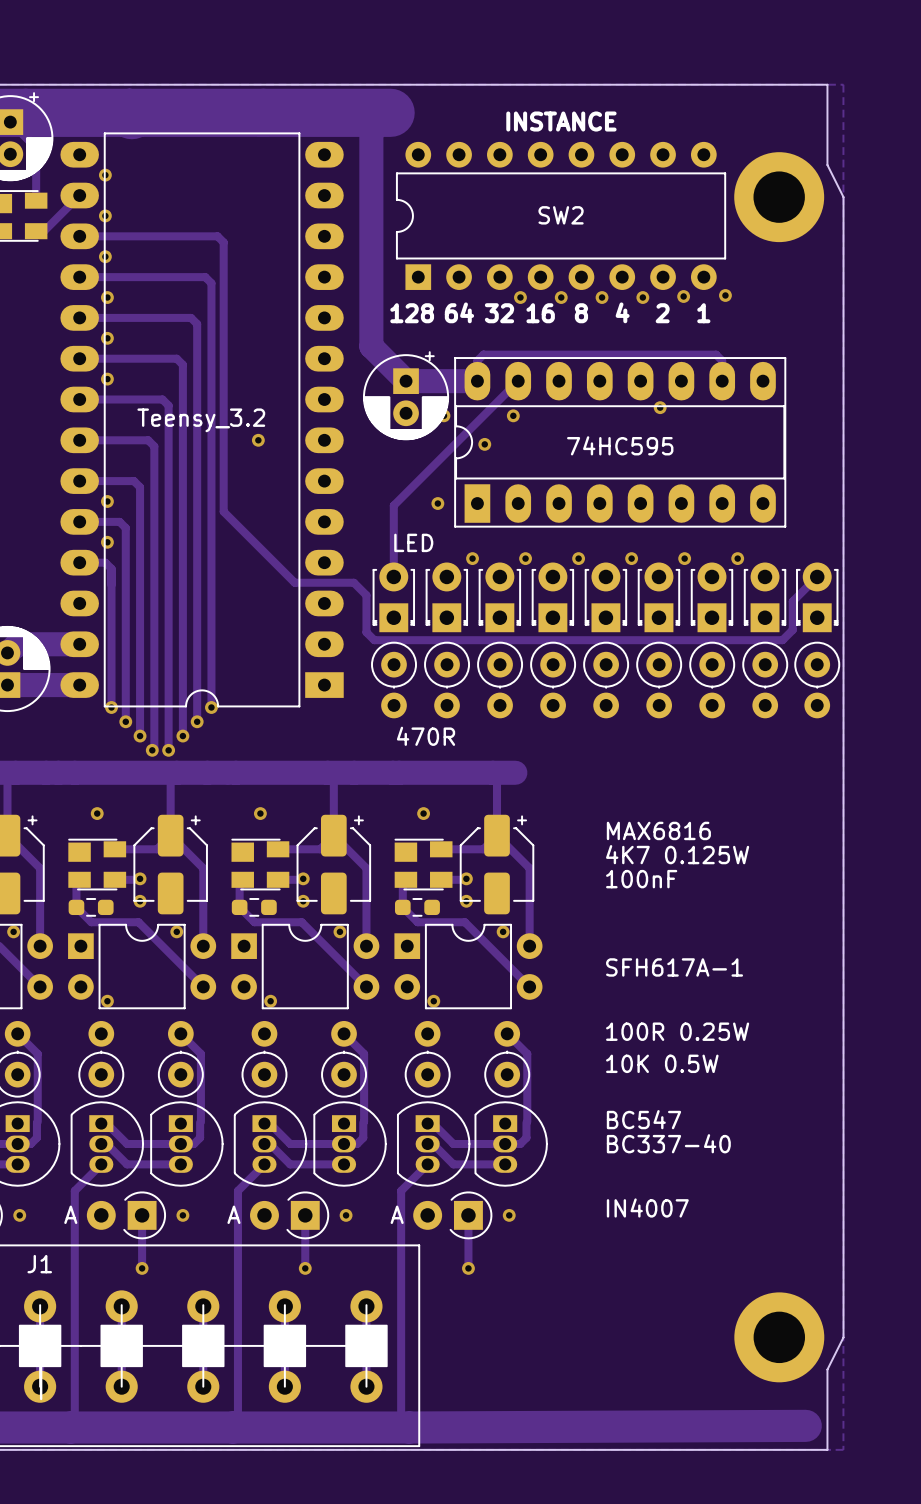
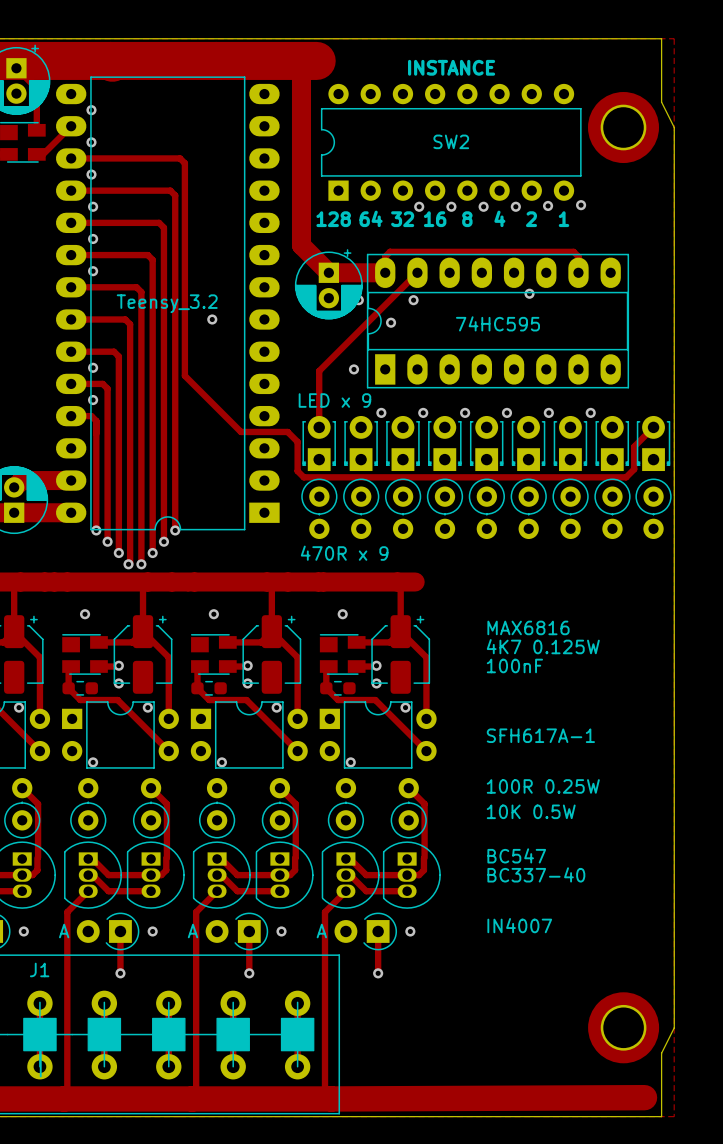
part value: LED (413, 542) -> LED x 9 (334, 400)
part value: 470R (426, 736) -> 470R x 9 (344, 553)

